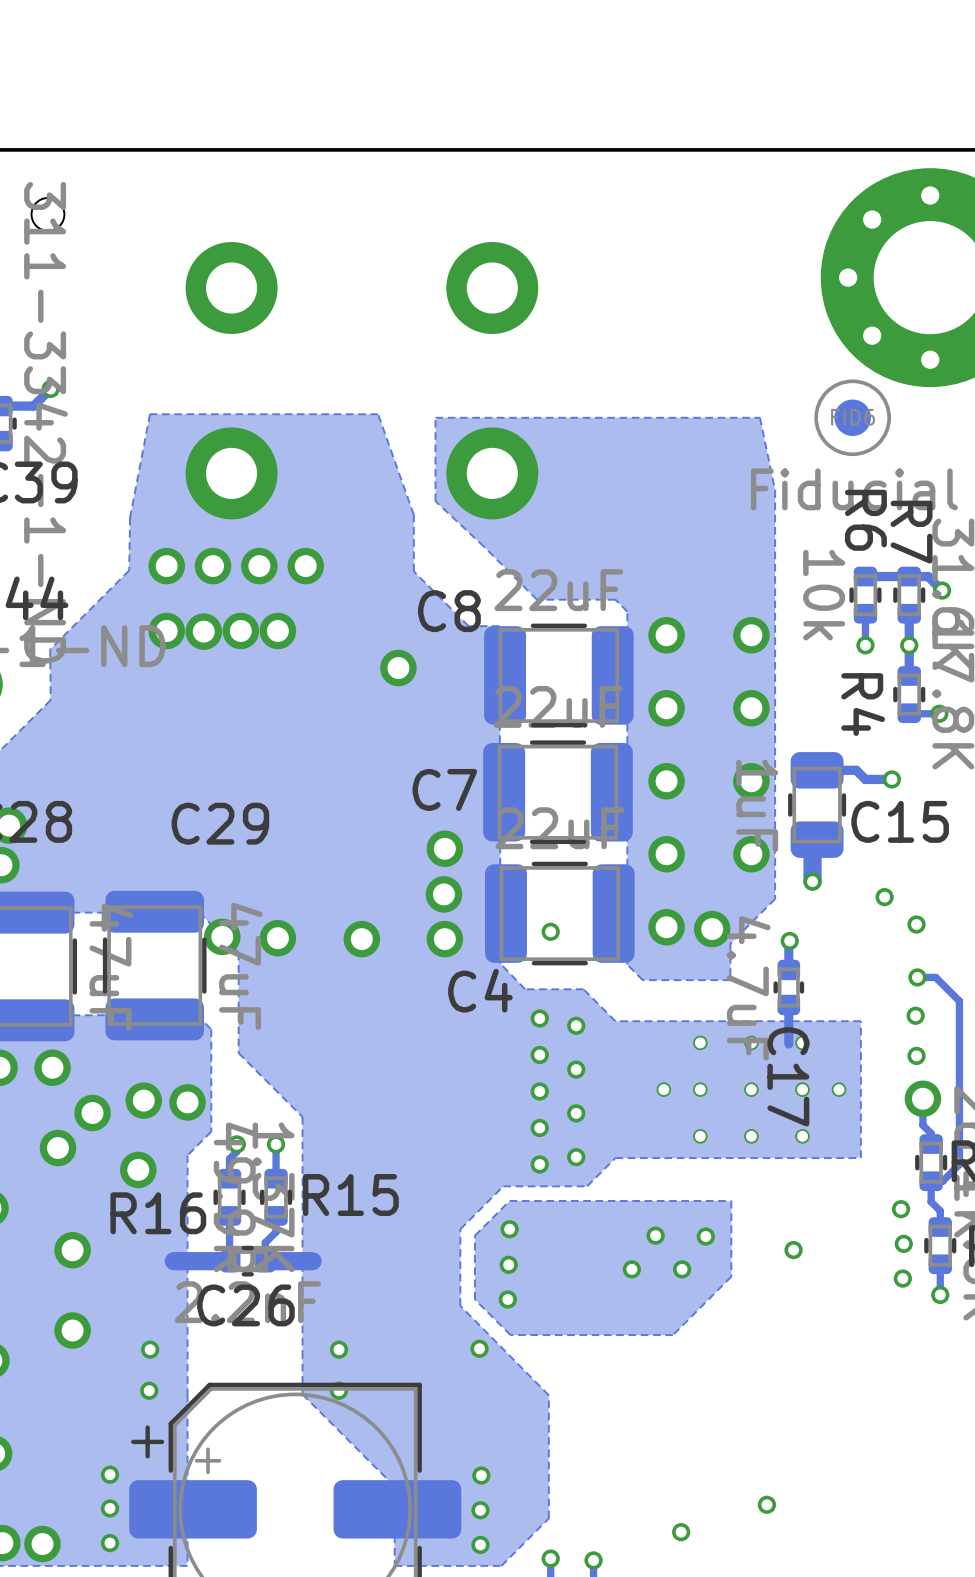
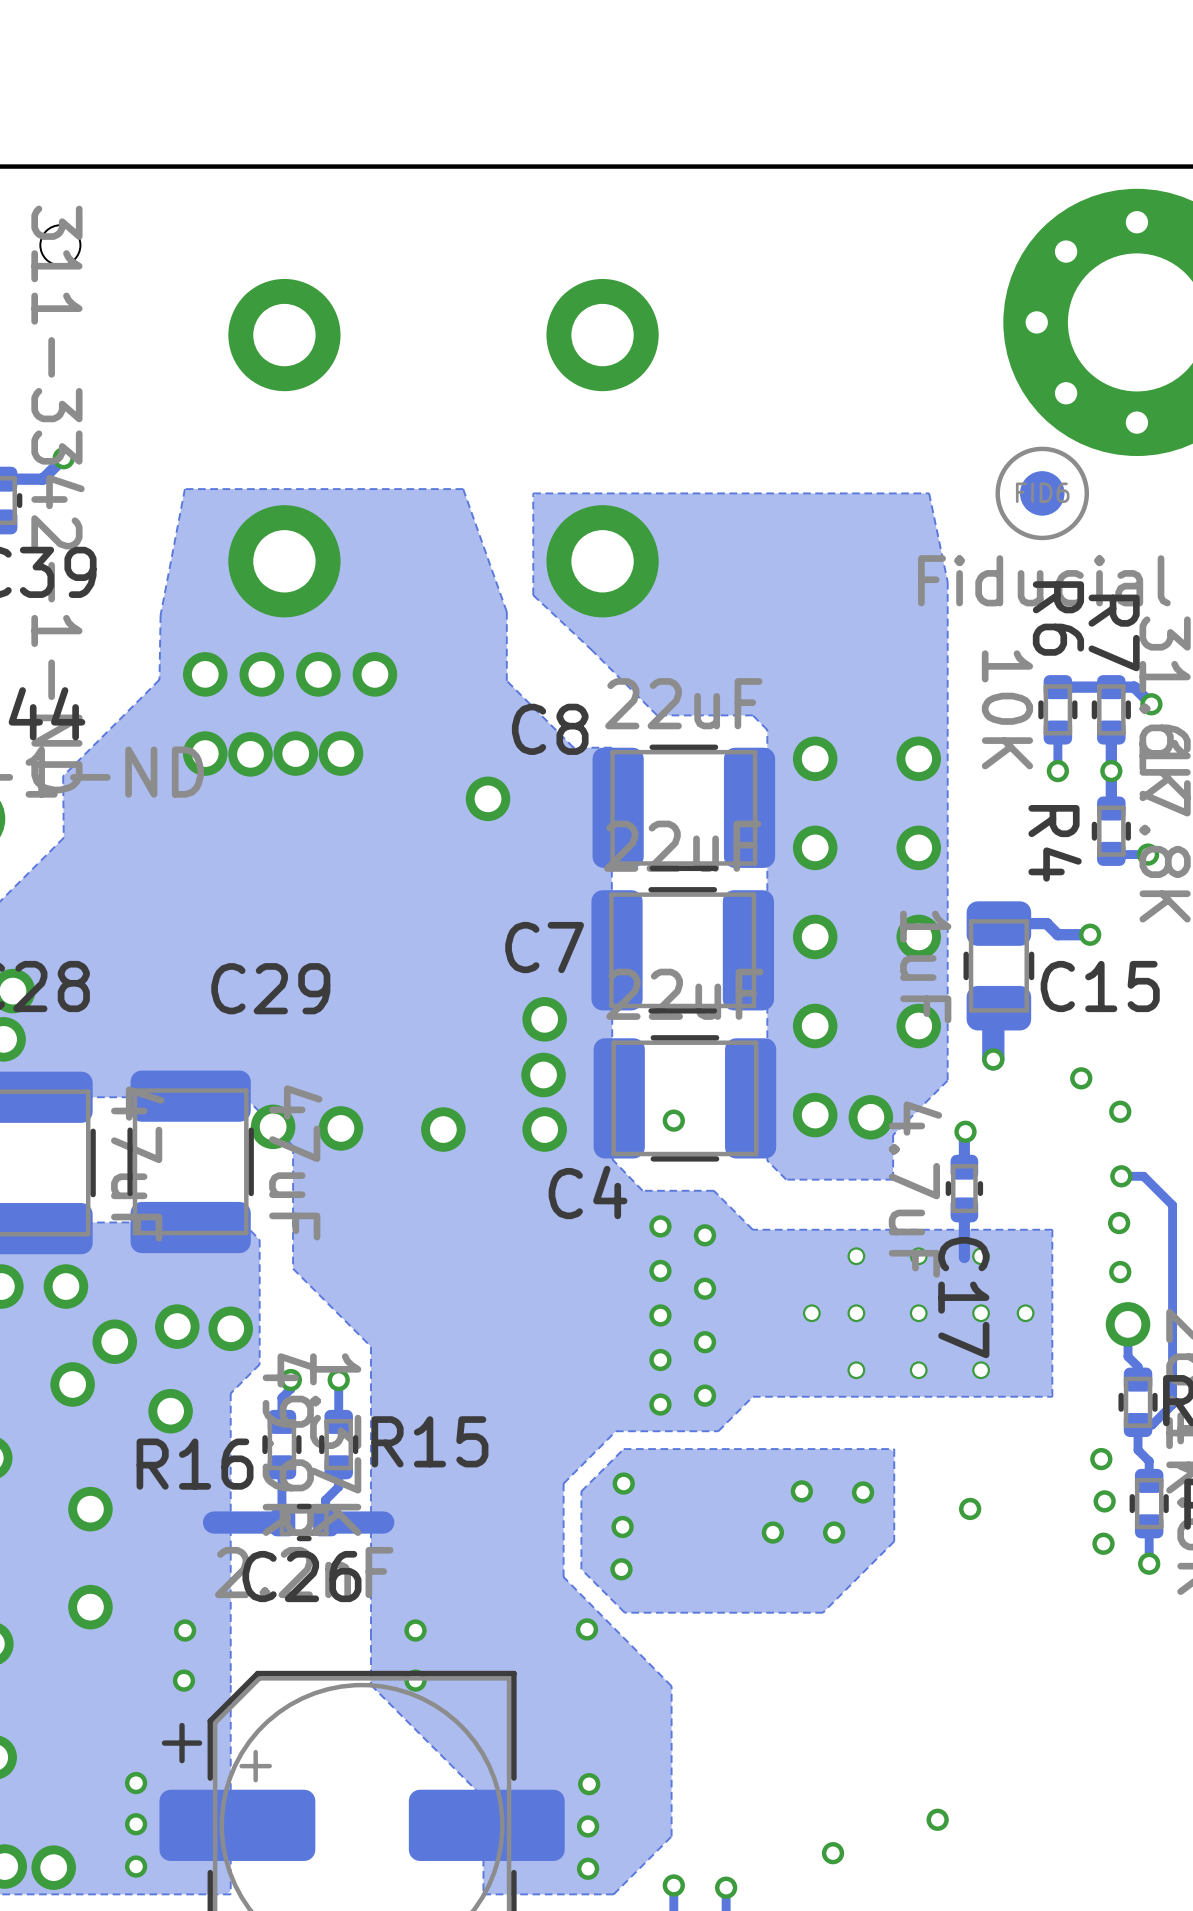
R6 value: 10k (824, 595) -> 10K (1007, 709)

